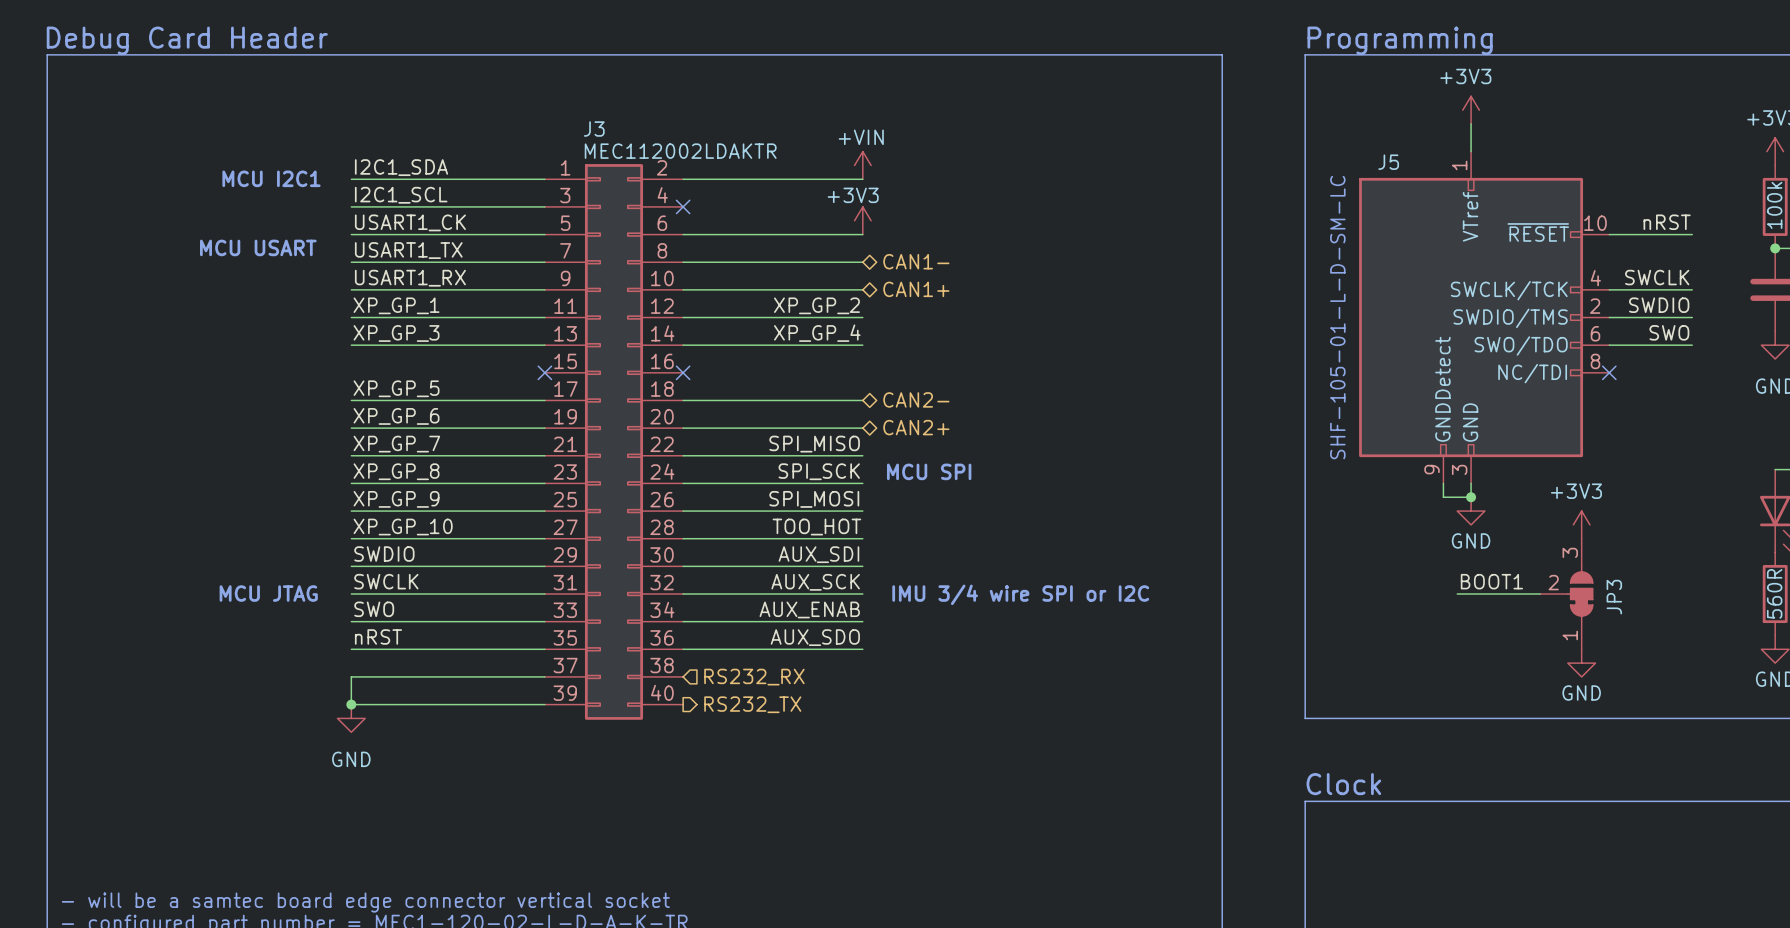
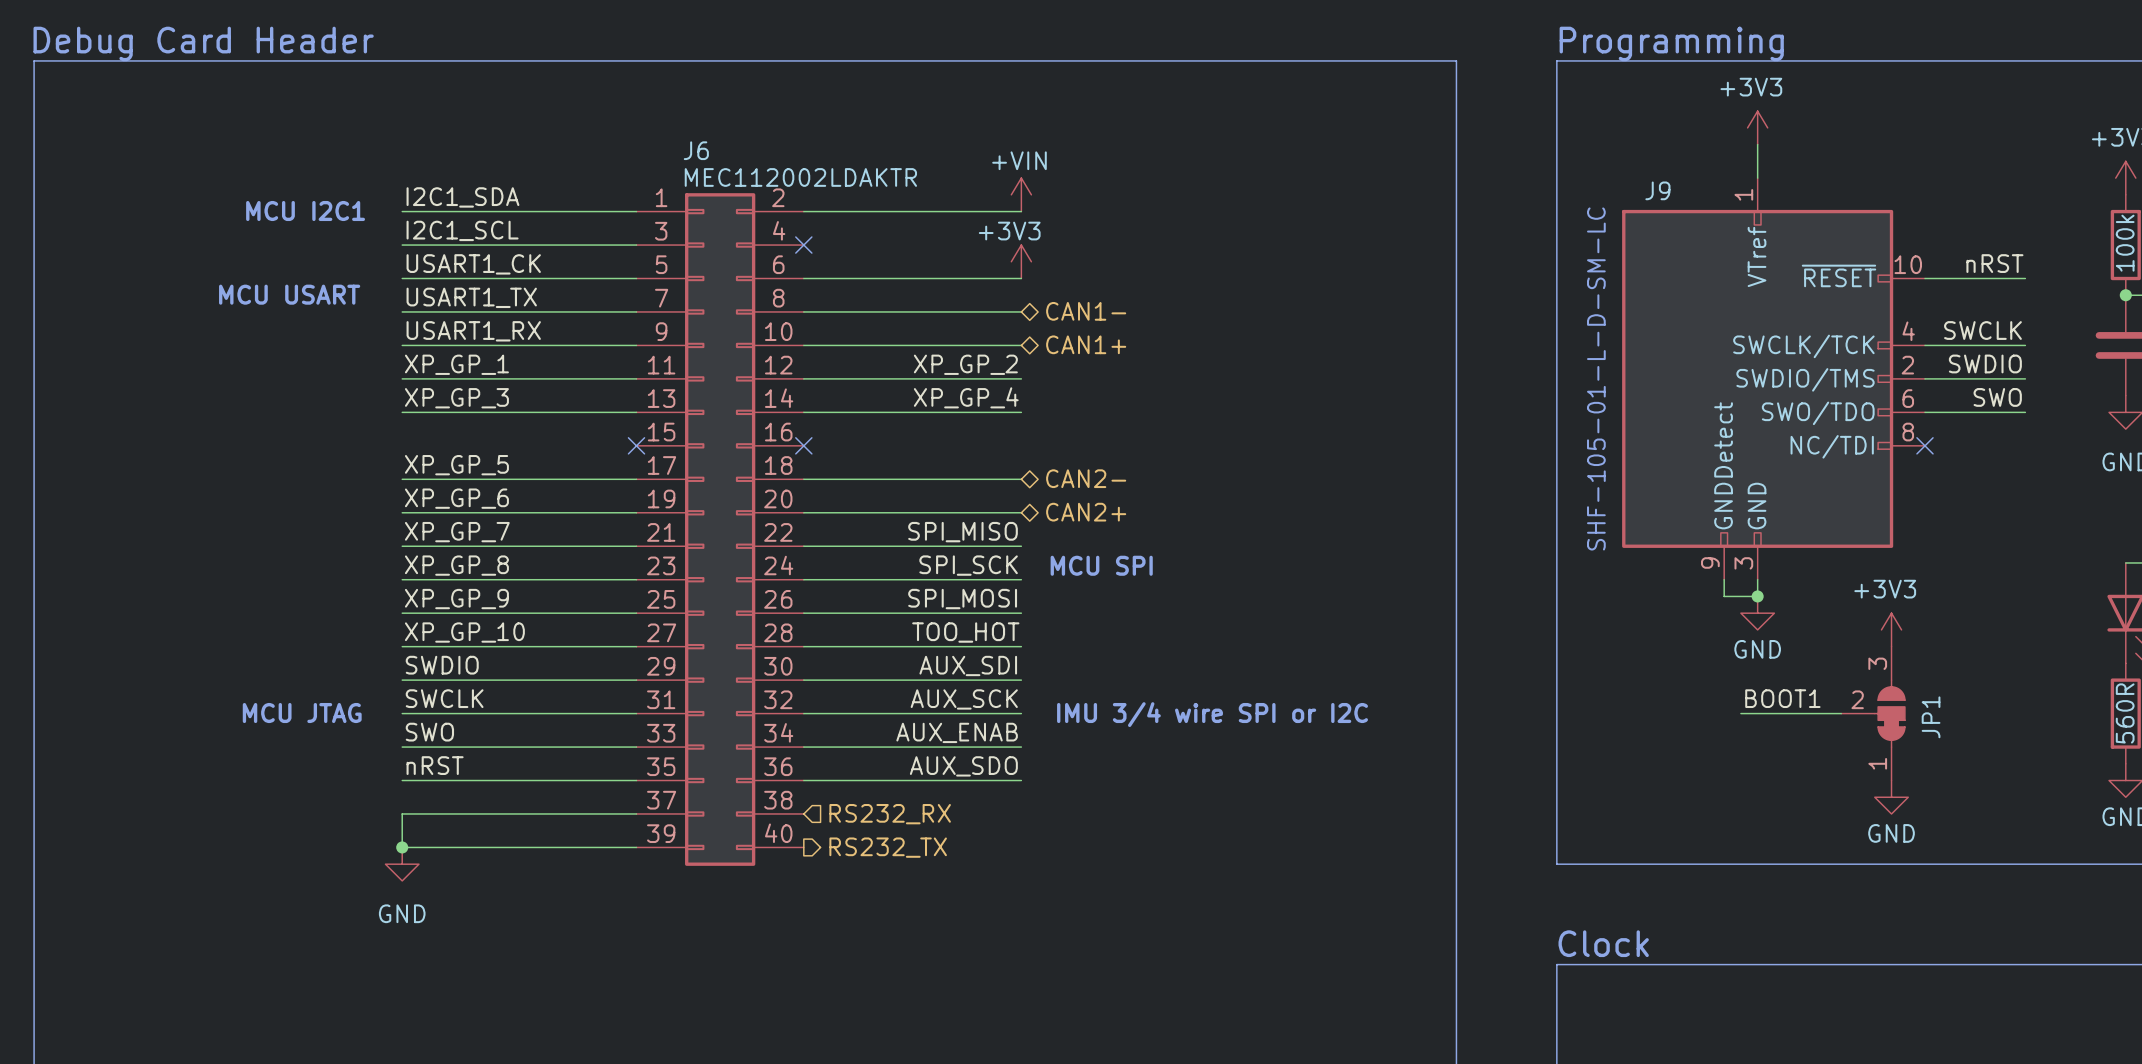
J3 name: J3 (594, 129) -> J6 (696, 150)
J5 name: J5 (1388, 162) -> J9 (1657, 190)
JP3 name: JP3 (1614, 597) -> JP1 (1931, 717)

